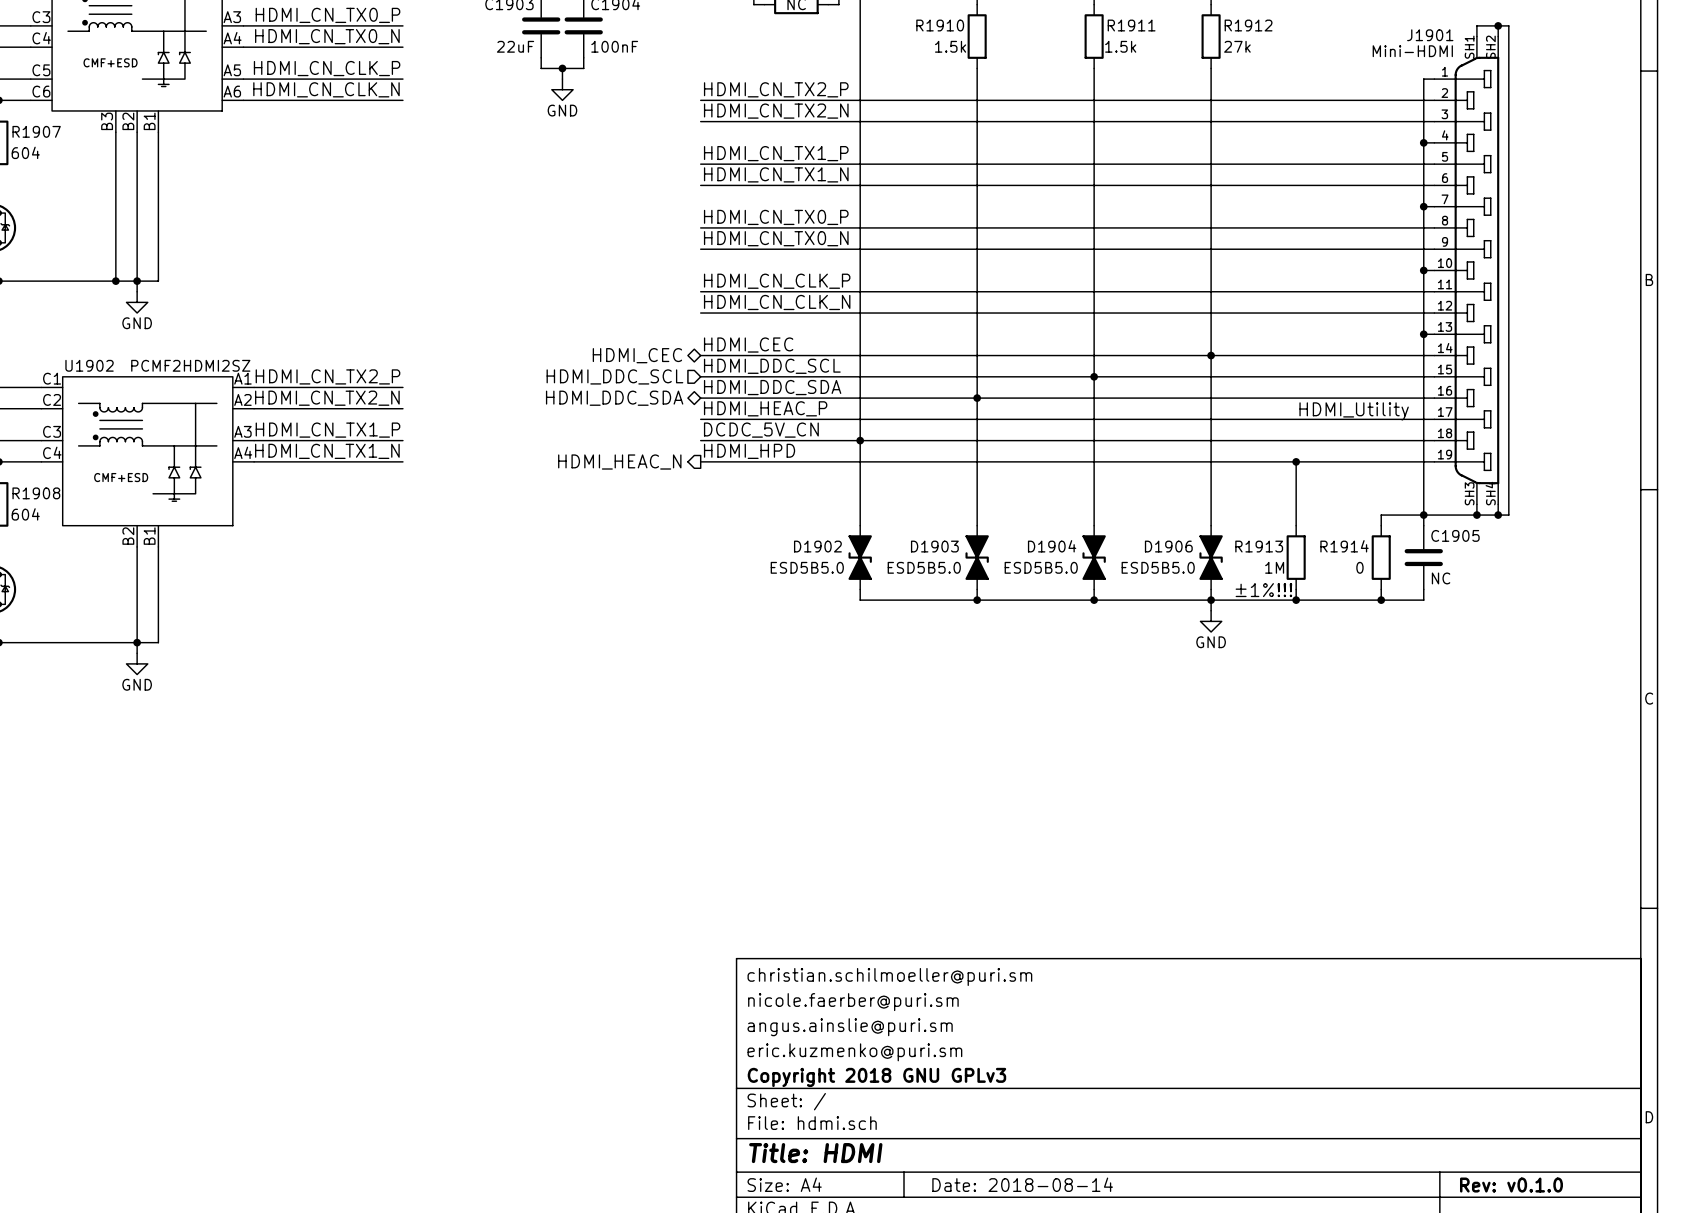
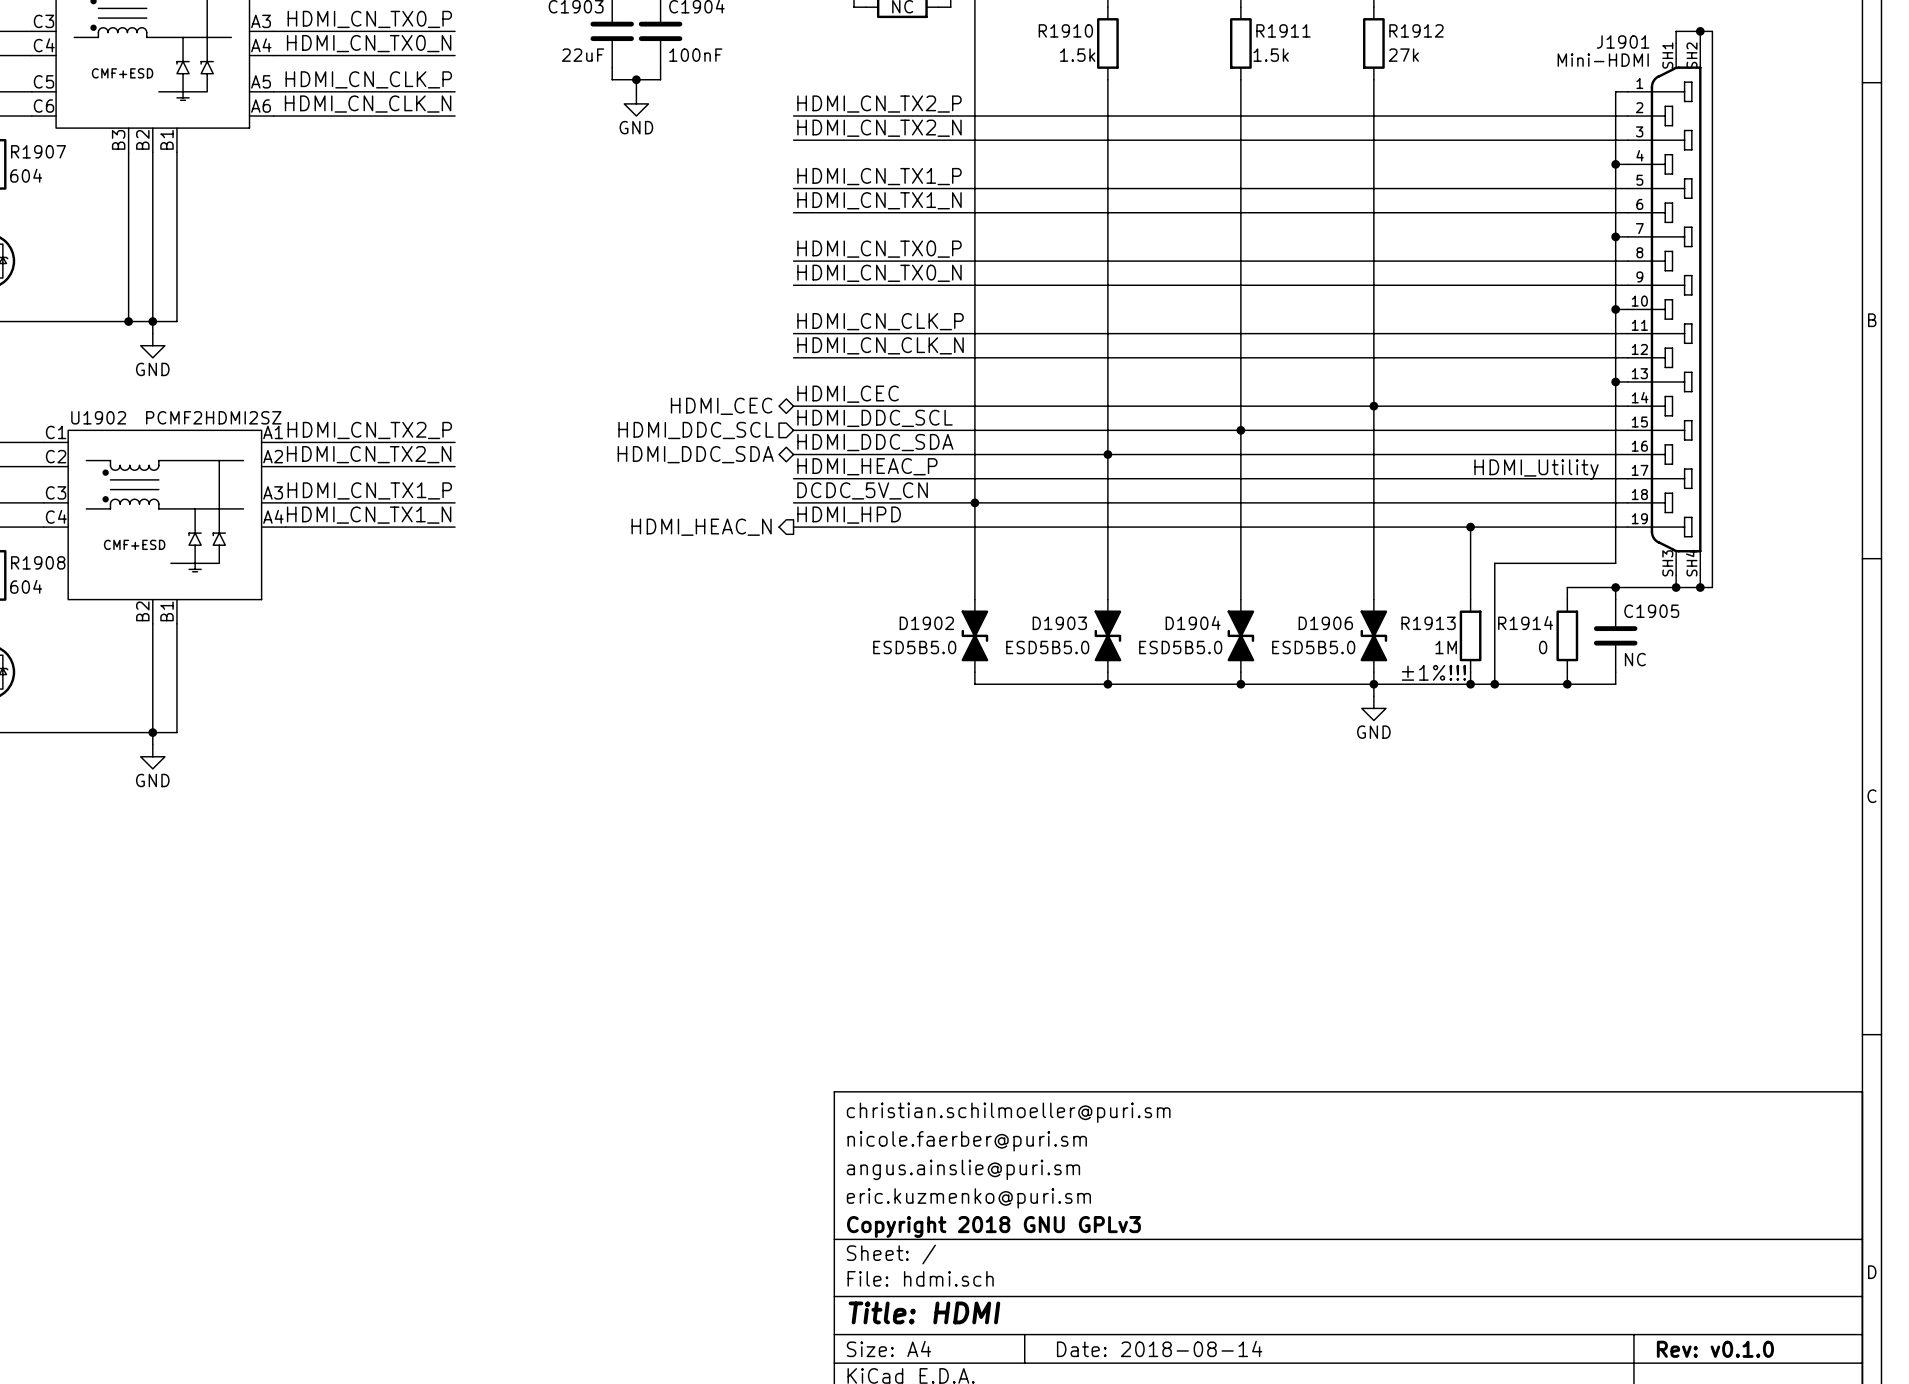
wire: (1423, 493) (1423, 515) -> (1615, 563) (1494, 563) (1494, 684)
junction: none -> (1494, 684)

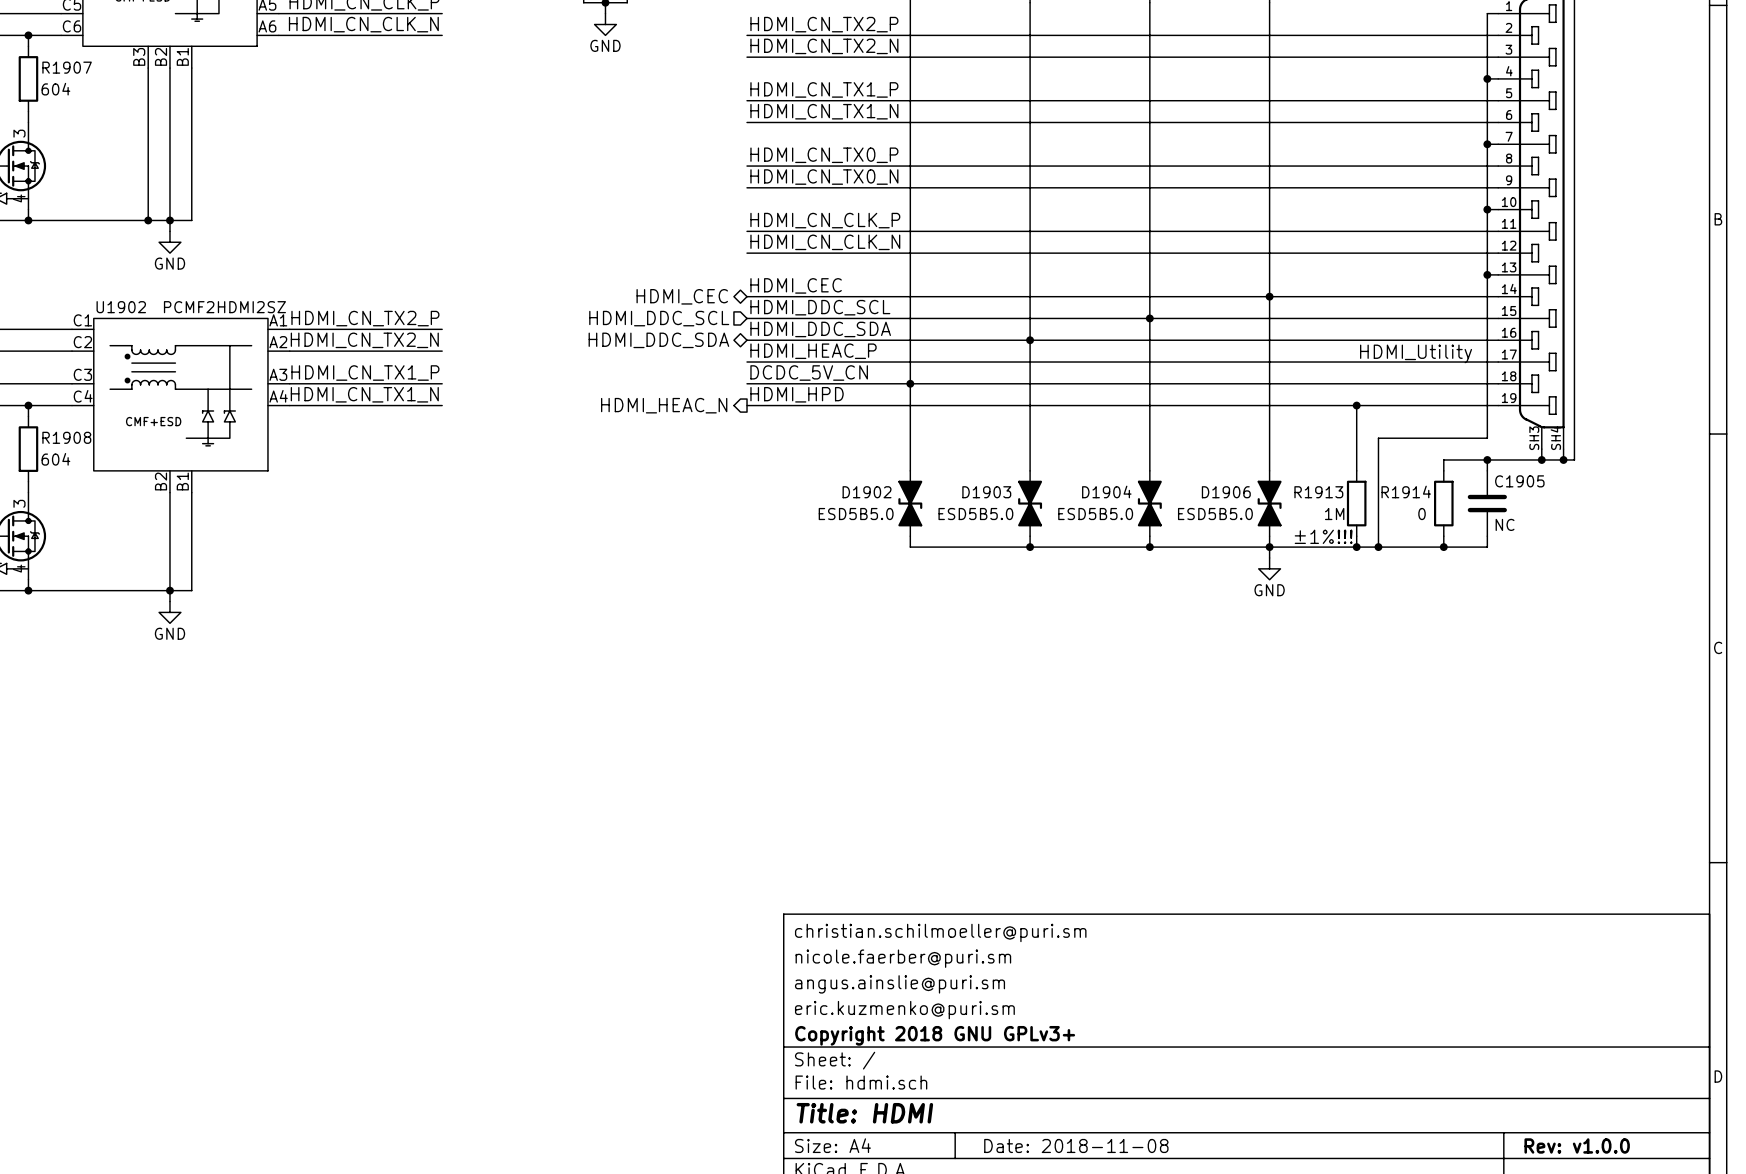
title block: Copyright 2018 GNU GPLv3 (993, 1226) -> Copyright 2018 GNU GPLv3+ (935, 1035)
title block: Date: 2018-08-14 (1159, 1348) -> Date: 2018-11-08 (1076, 1145)
title block: Rev: v0.1.0 (1715, 1349) -> Rev: v1.0.0 (1577, 1145)

